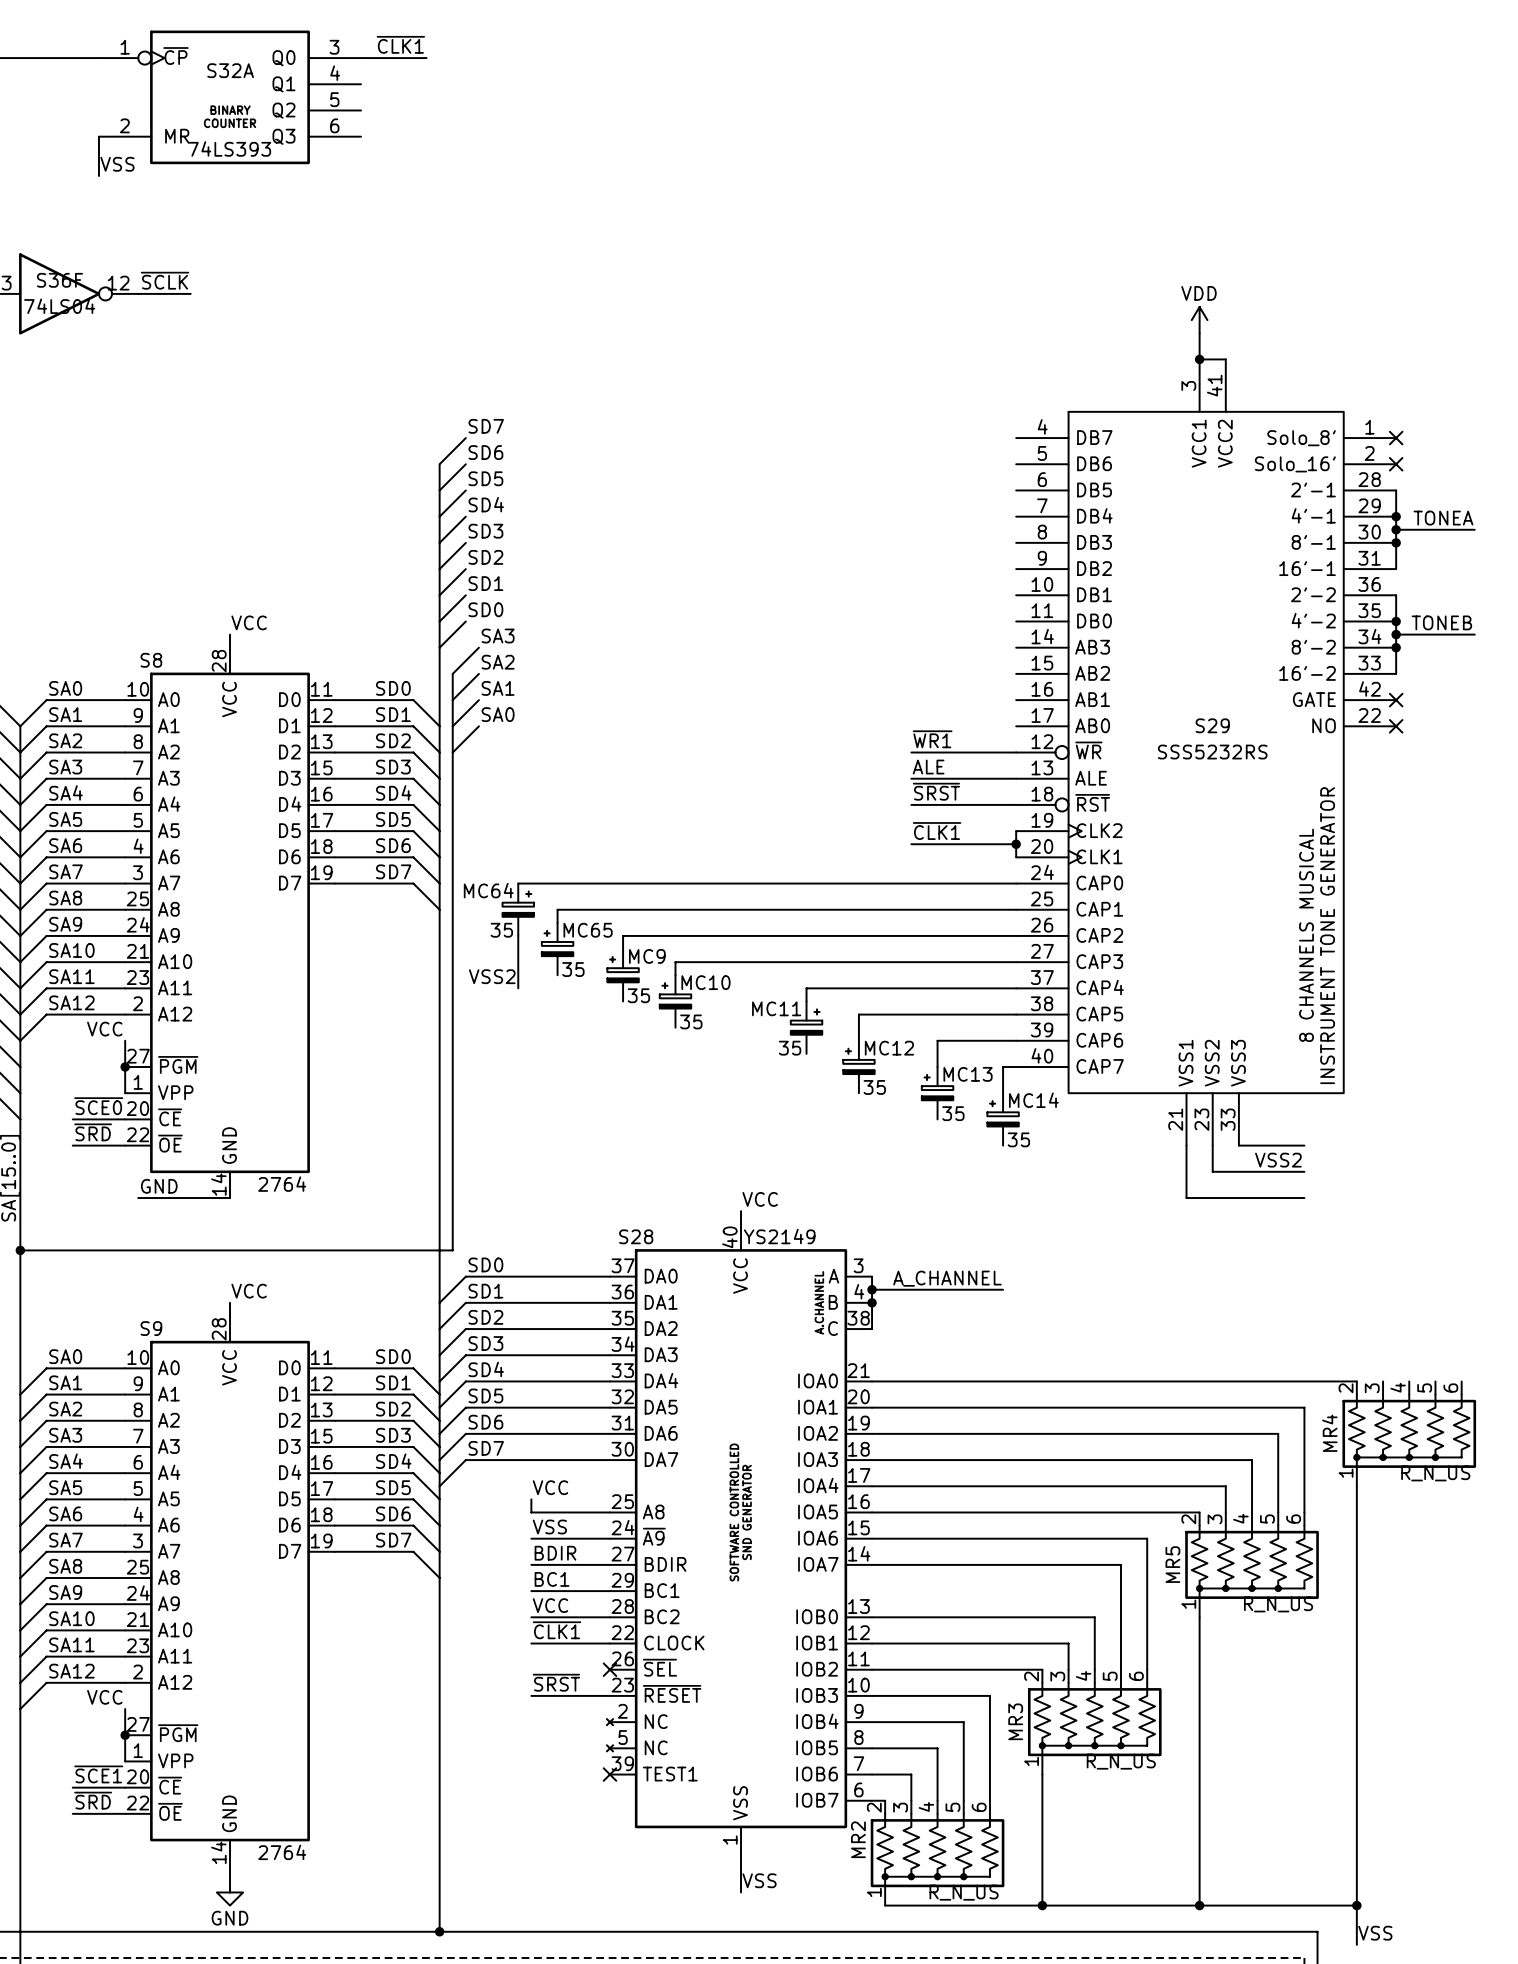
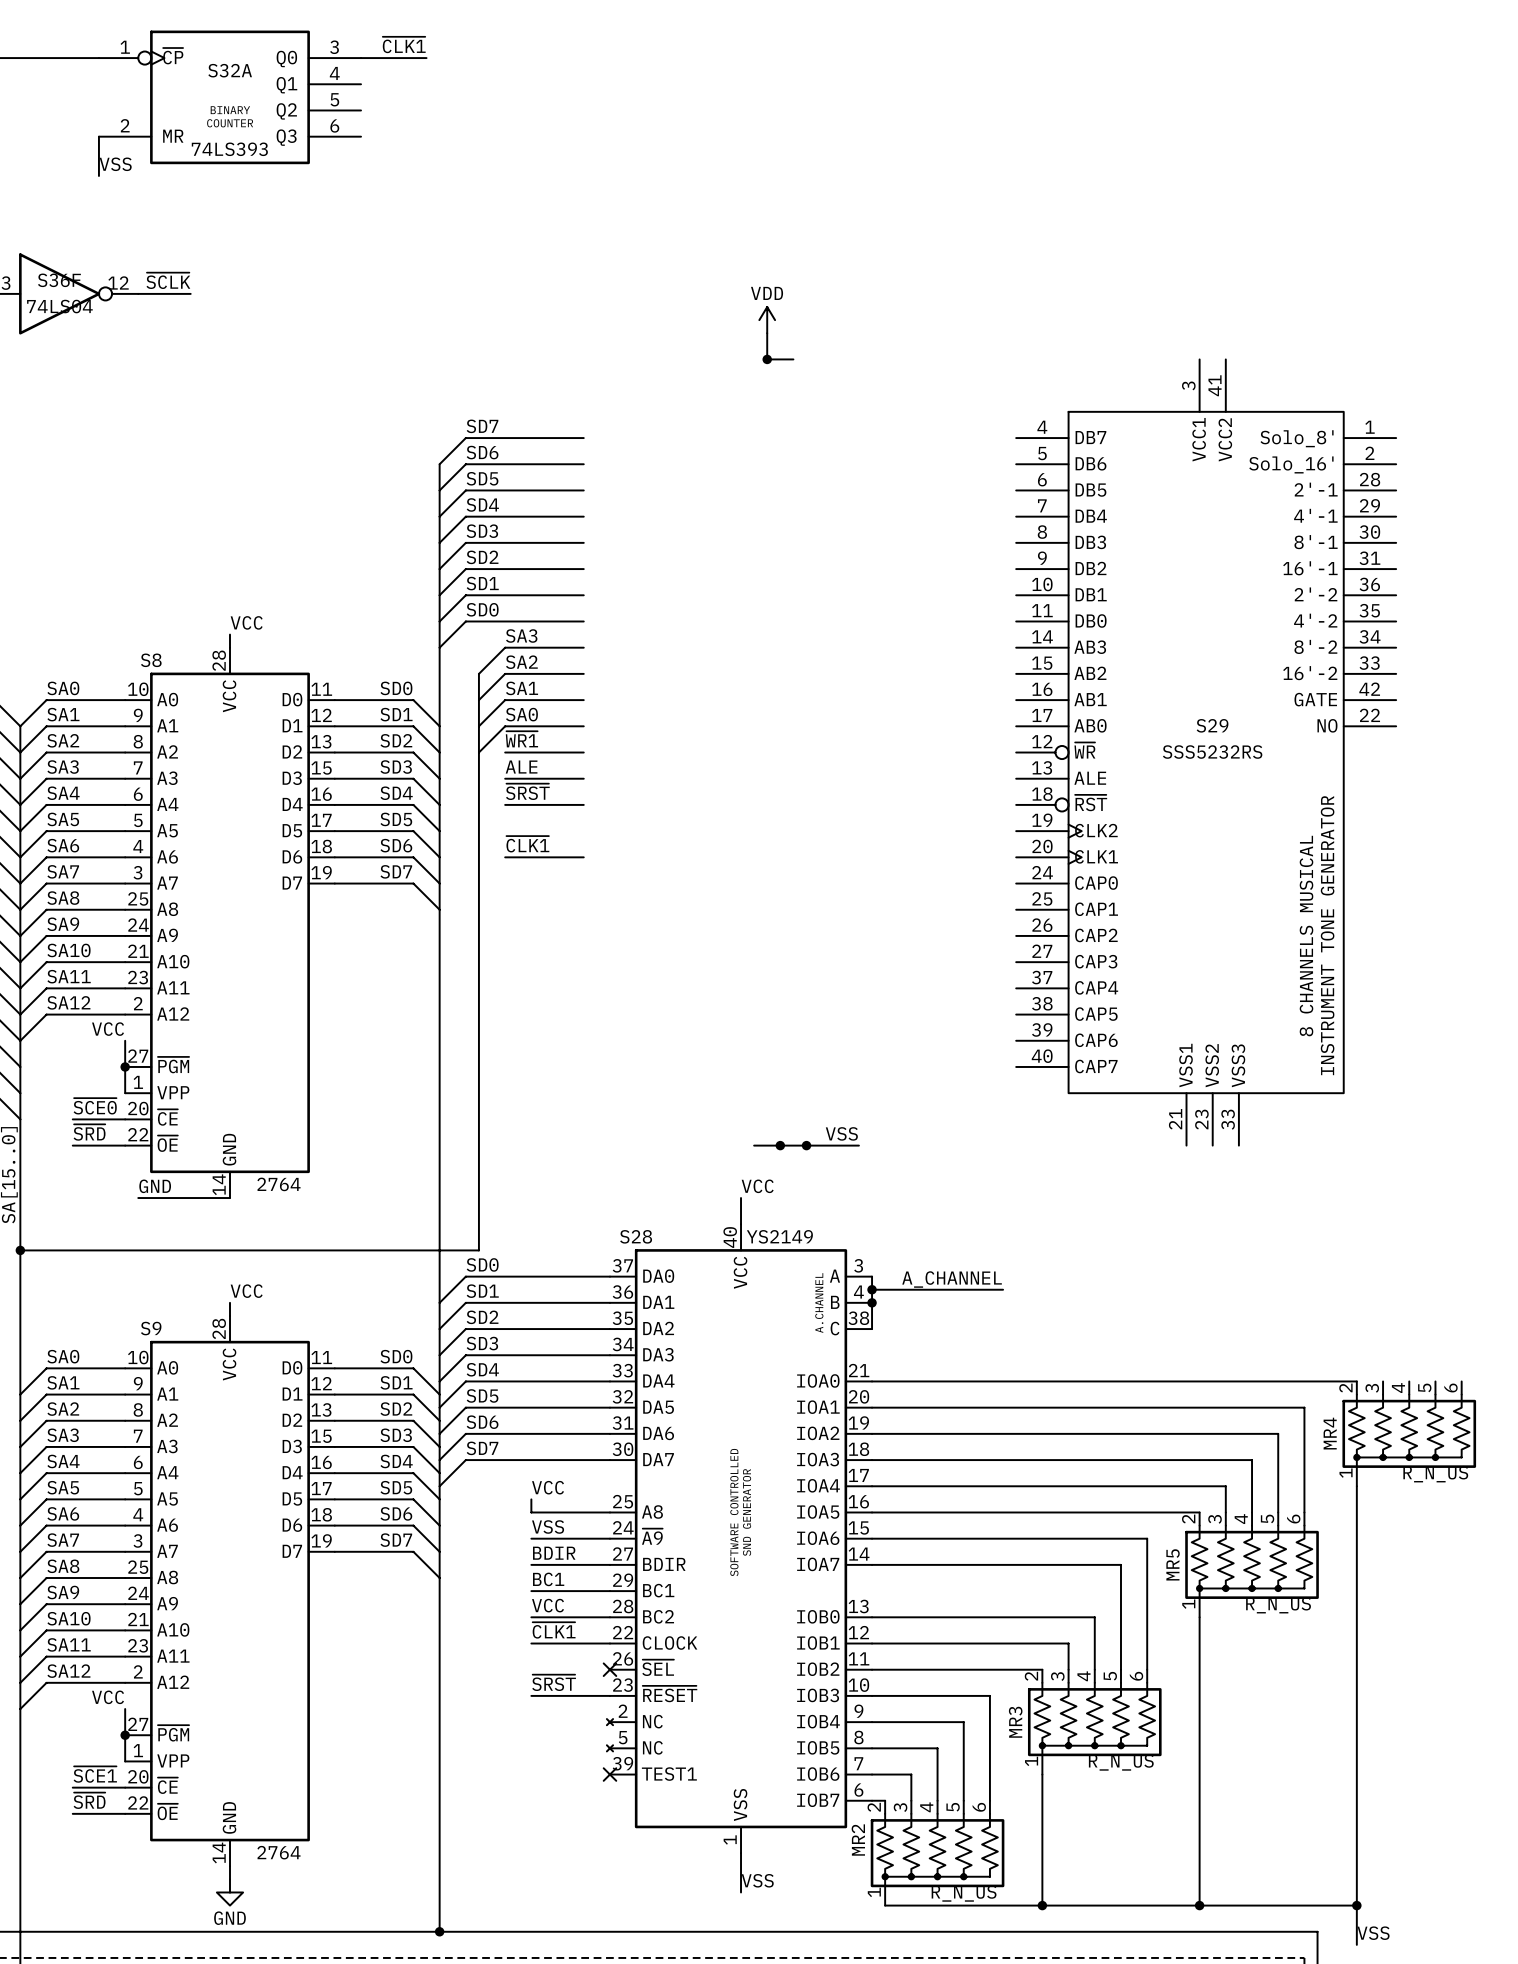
power symbol: none -> VDD (767, 320)
power symbol: VDD (1199, 320) -> none
wire: none -> (767, 333) (767, 359) (793, 359)
wire: (1199, 333) (1199, 359) (1225, 359) -> none
junction: none -> (767, 359)
junction: (1199, 359) -> none
wire: none -> (465, 438) (583, 438)
no-connect mark: (1396, 438) -> none
wire: none -> (465, 464) (583, 464)
no-connect mark: (1396, 464) -> none
wire: none -> (465, 490) (583, 490)
wire: (1396, 490) (1396, 569) -> none
wire: none -> (465, 516) (583, 516)
junction: (1396, 516) -> none
label: TONEA (1443, 518) -> none
wire: (1396, 529) (1474, 529) -> none
junction: (1396, 529) -> none
wire: none -> (465, 542) (583, 542)
junction: (1396, 542) -> none
wire: none -> (465, 569) (583, 569)
wire: none -> (465, 595) (583, 595)
wire: (1396, 595) (1396, 673) -> none
wire: none -> (465, 621) (583, 621)
junction: (1396, 621) -> none
label: TONEB (1441, 622) -> none
wire: (1396, 634) (1474, 634) -> none
junction: (1396, 634) -> none
label position: SA3 (498, 636) -> SA3 (521, 636)
wire: (478, 647) (452, 673) -> none
junction: (1396, 647) -> none
label position: SA2 (498, 662) -> SA2 (521, 662)
bus: (452, 673) (452, 1250) -> (478, 673) (478, 1250) (452, 1250)
wire: (478, 673) (452, 700) -> (478, 673) (505, 647) (583, 647)
label position: SA1 (498, 688) -> SA1 (522, 688)
wire: (478, 700) (452, 726) -> (478, 700) (505, 673) (583, 673)
no-connect mark: (1396, 700) -> none
label position: SA0 (498, 714) -> SA0 (521, 714)
wire: (478, 726) (452, 752) -> (478, 726) (505, 700) (583, 700)
wire: none -> (583, 726) (505, 726) (478, 752)
no-connect mark: (1396, 726) -> none
label: none -> ~{WR1} (521, 739)
label: ~{WR1} (932, 739) -> none
wire: none -> (505, 752) (583, 752)
wire: (911, 752) (1016, 752) -> none
label: none -> ALE (521, 767)
label: ALE (928, 767) -> none
wire: none -> (505, 778) (583, 778)
wire: (911, 778) (1016, 778) -> none
label: none -> ~{SRST} (527, 791)
label: ~{SRST} (936, 791) -> none
wire: none -> (505, 804) (583, 804)
wire: (911, 804) (1016, 804) -> none
label: ~{CLK1} (937, 831) -> none
wire: (1016, 831) (1016, 857) -> none
label: none -> ~{CLK1} (527, 844)
wire: (911, 844) (1016, 844) -> none
junction: (1016, 844) -> none
wire: none -> (505, 857) (583, 857)
wire: (518, 883) (1016, 883) -> none
MC64: 35 (518, 909) -> none
wire: (1016, 909) (557, 909) (557, 922) -> none
wire: (518, 935) (518, 988) -> none
wire: (1016, 935) (623, 935) (623, 949) -> none
MC65: 35 (557, 949) -> none
wire: (1016, 962) (675, 962) (675, 975) -> none
MC9: 35 (623, 975) -> none
label: VSS2 (492, 976) -> none
wire: (1016, 988) (806, 988) (806, 1001) -> none
MC10: 35 (675, 1001) -> none
wire: (1016, 1014) (858, 1014) (858, 1040) -> none
MC11: 35 (806, 1027) -> none
wire: (1016, 1040) (937, 1040) (937, 1066) -> none
MC12: 35 (858, 1066) -> none
wire: (1016, 1066) (1003, 1066) (1003, 1093) -> none
MC13: 35 (937, 1093) -> none
MC14: 35 (1003, 1119) -> none
label: none -> VSS (841, 1133)
wire: none -> (754, 1145) (858, 1145)
junction: none -> (780, 1145)
junction: none -> (806, 1145)
wire: (1186, 1145) (1186, 1198) (1304, 1198) -> none
wire: (1212, 1145) (1212, 1171) (1304, 1171) -> none
wire: (1238, 1145) (1304, 1145) -> none
label: VSS2 (1278, 1160) -> none
wire: none -> (741, 1198) (741, 1211)
label position: VCC (760, 1199) -> VCC (757, 1186)

